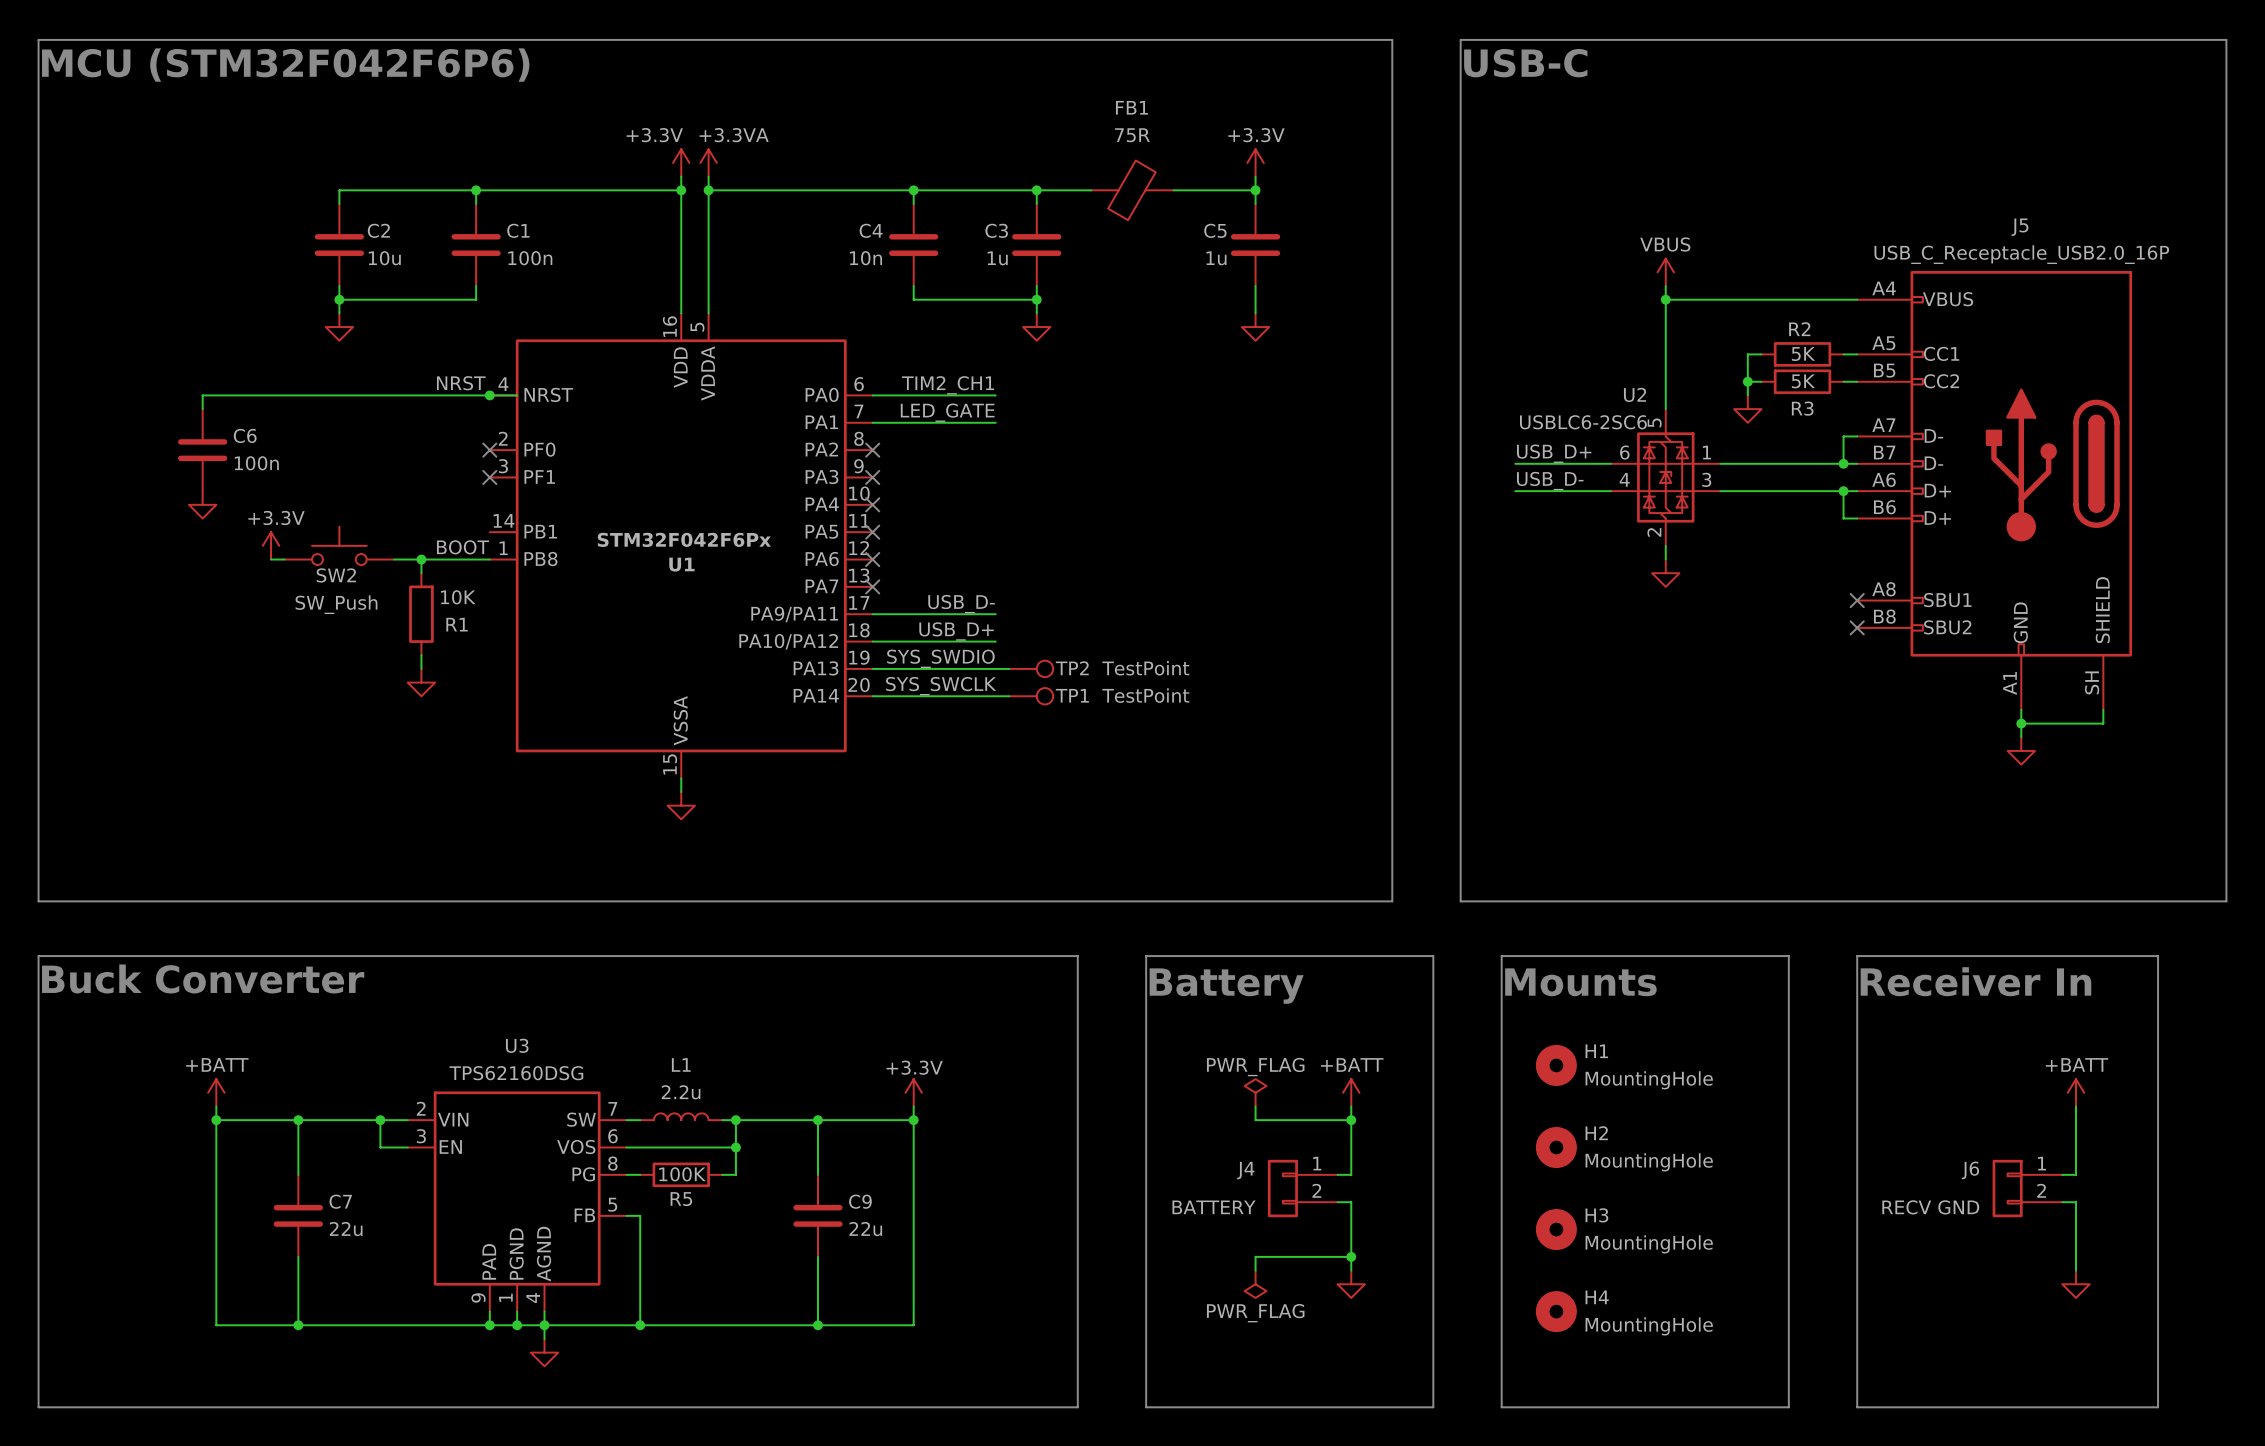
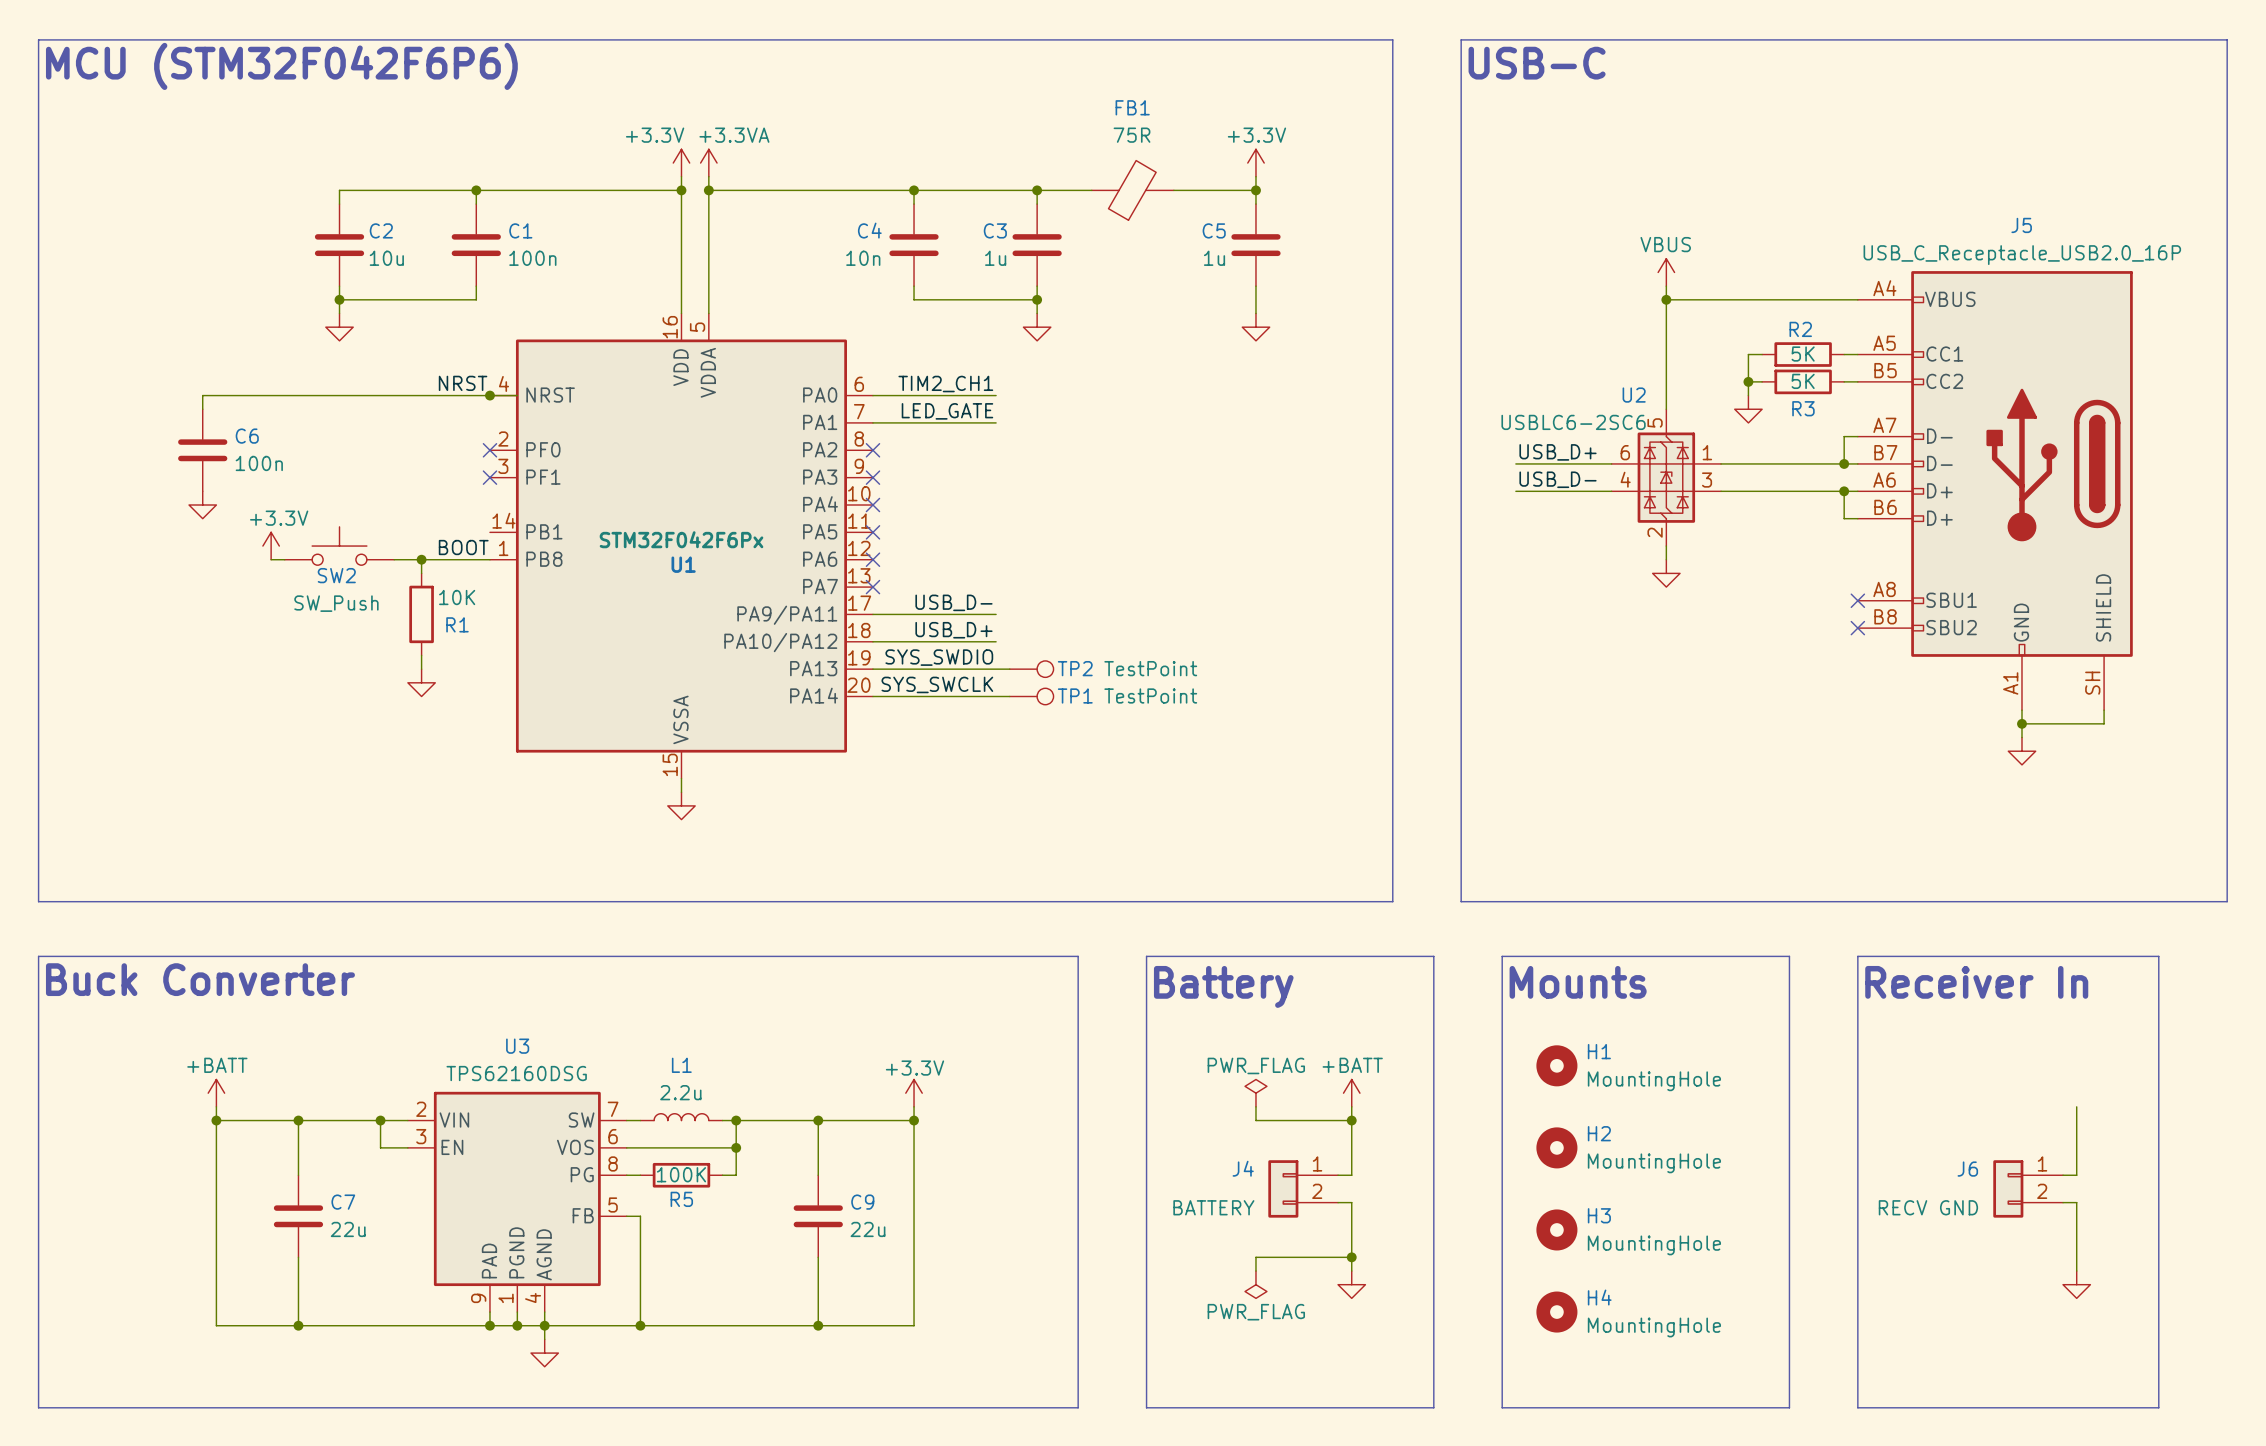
power symbol: +BATT (2075, 1092) -> none

